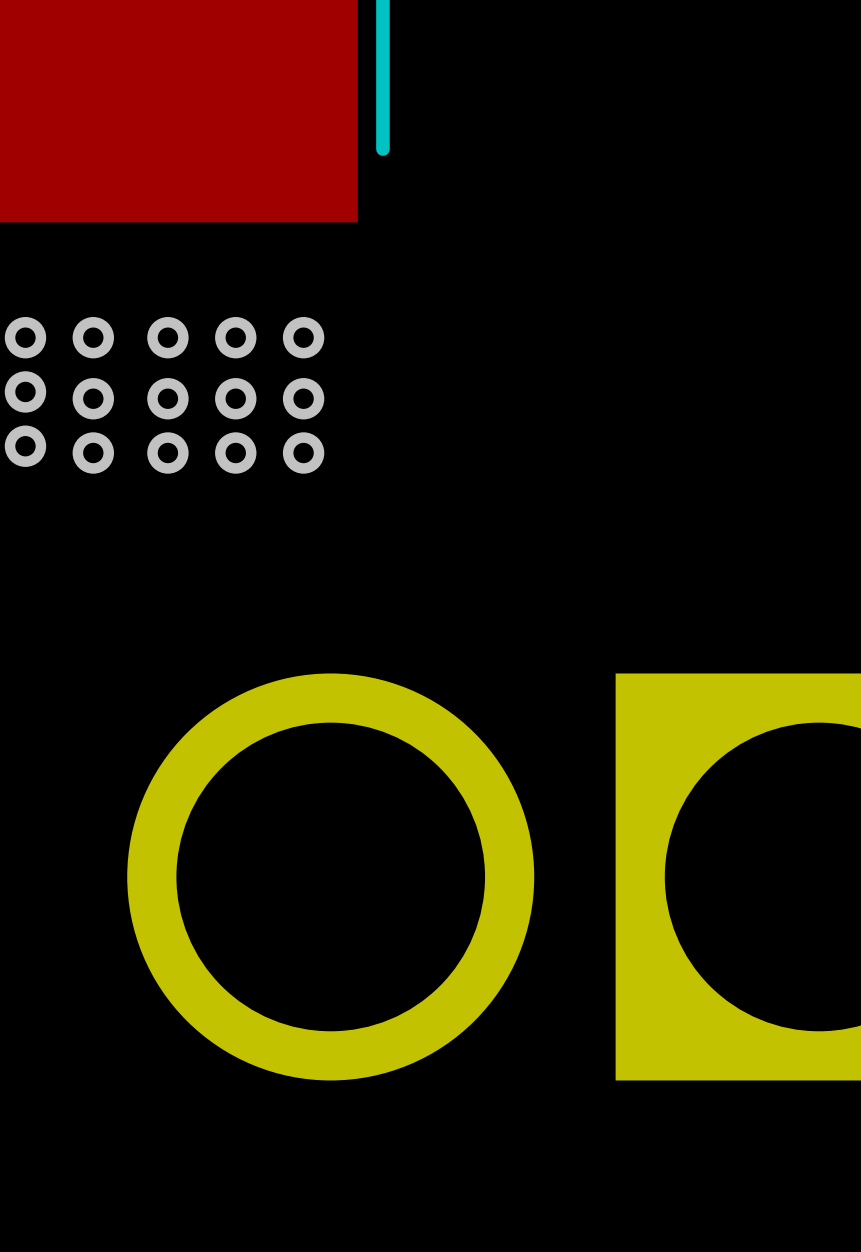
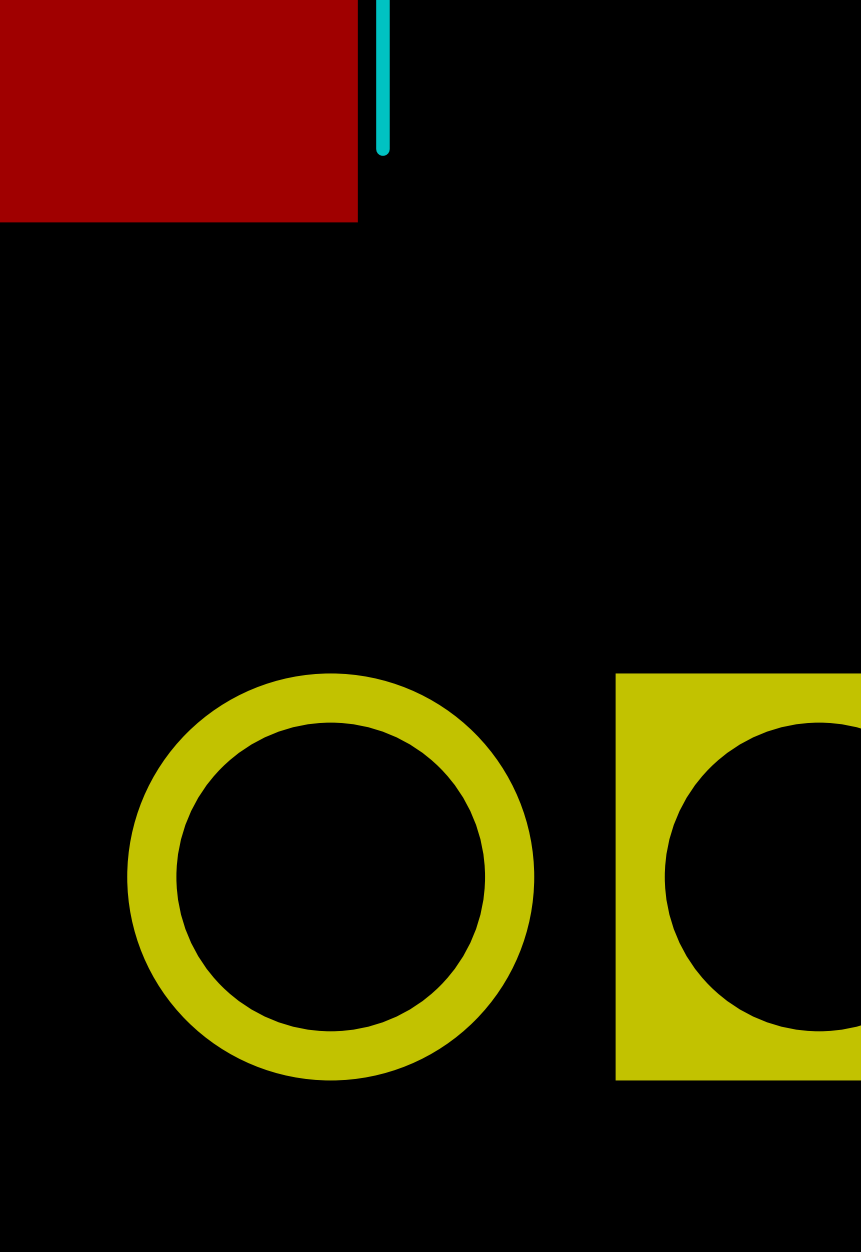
via: (25, 337) -> none
via: (93, 337) -> none
via: (167, 337) -> none
via: (235, 337) -> none
via: (303, 337) -> none
via: (25, 391) -> none
via: (93, 398) -> none
via: (167, 398) -> none
via: (235, 398) -> none
via: (303, 398) -> none
via: (25, 446) -> none
via: (93, 453) -> none
via: (167, 453) -> none
via: (235, 453) -> none
via: (303, 453) -> none

